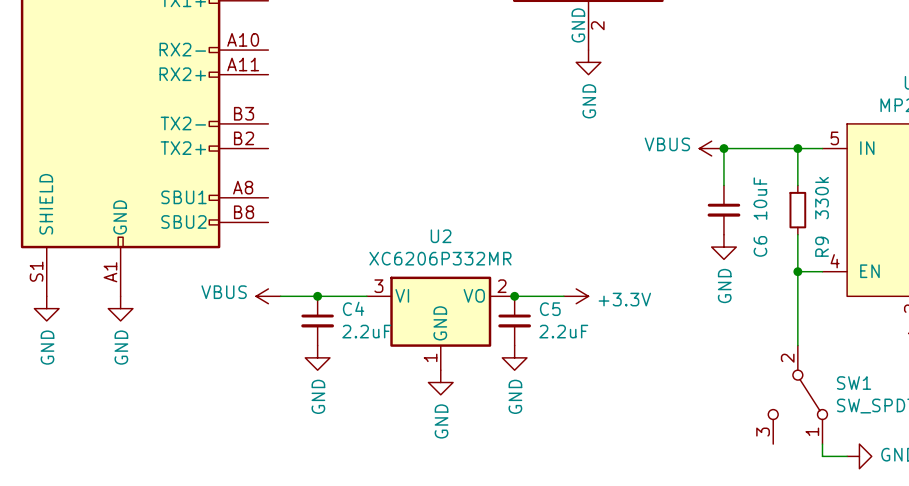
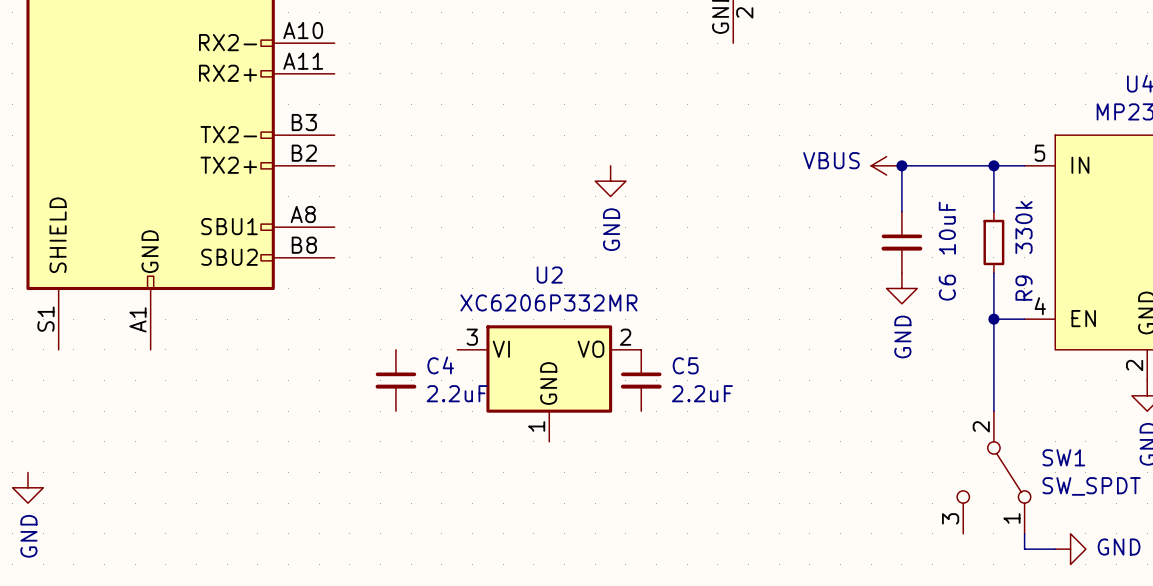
power symbol: GND (588, 62) -> none
power symbol: none -> GND (610, 181)
power symbol: VBUS (268, 296) -> none
wire: (280, 296) (366, 296) -> none
junction: (317, 296) -> none
wire: (514, 296) (563, 296) -> none
junction: (514, 296) -> none
power symbol: +3.3V (576, 296) -> none
power symbol: GND (46, 308) -> none
power symbol: GND (120, 308) -> none
power symbol: GND (317, 357) -> none
power symbol: GND (514, 357) -> none
power symbol: GND (440, 382) -> none
power symbol: none -> GND (27, 487)

